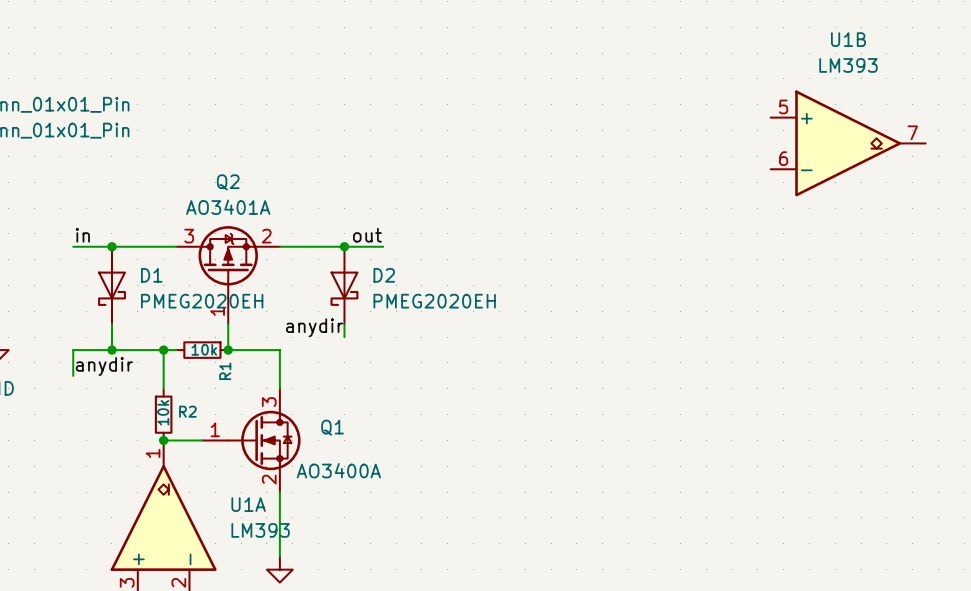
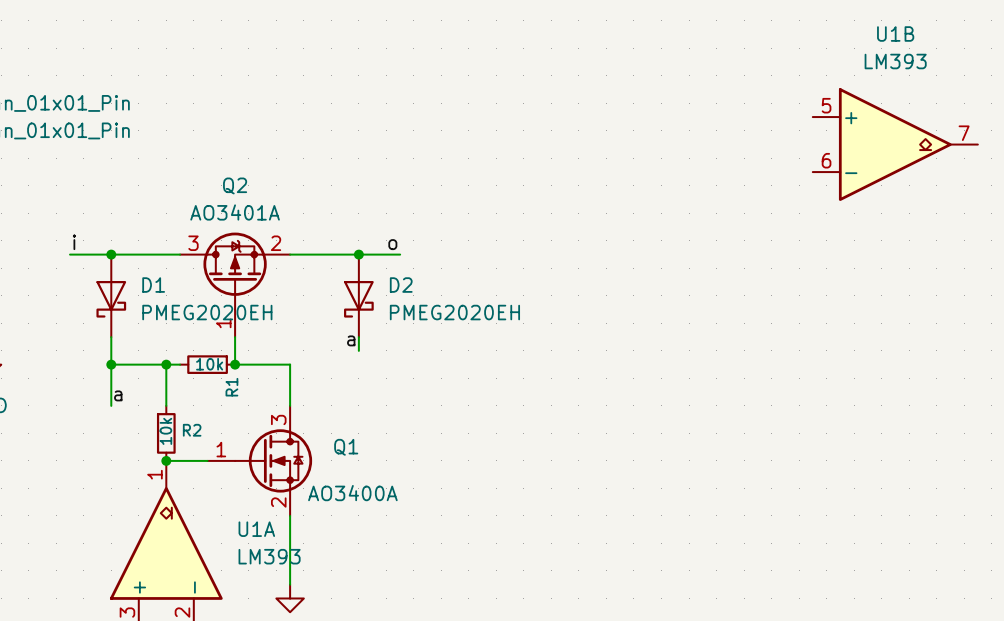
label: in (82, 235) -> i (74, 242)
label: out (367, 235) -> o (392, 244)
label: anydir (314, 327) -> a (351, 340)
wire: (111, 350) (73, 350) (73, 375) -> (111, 364) (111, 405)
label: anydir (104, 366) -> none
label: none -> a (118, 395)

